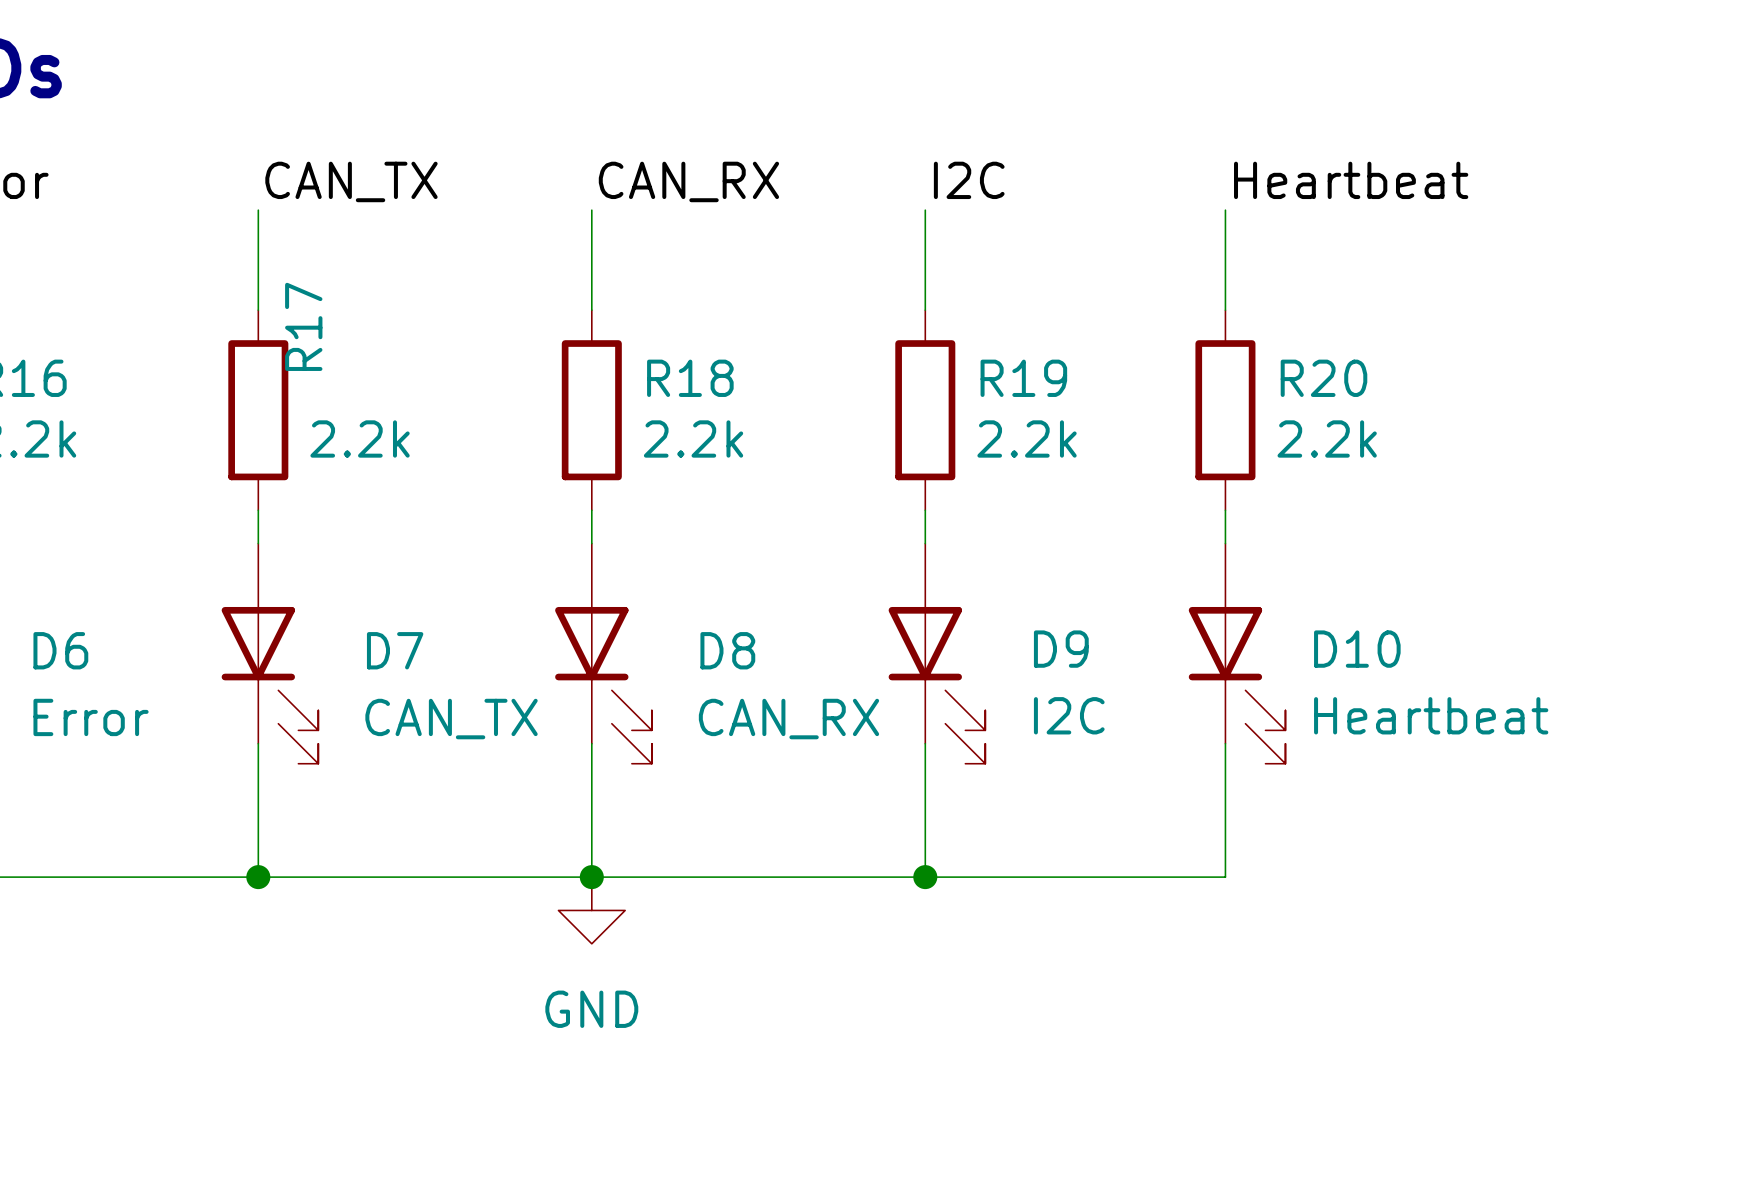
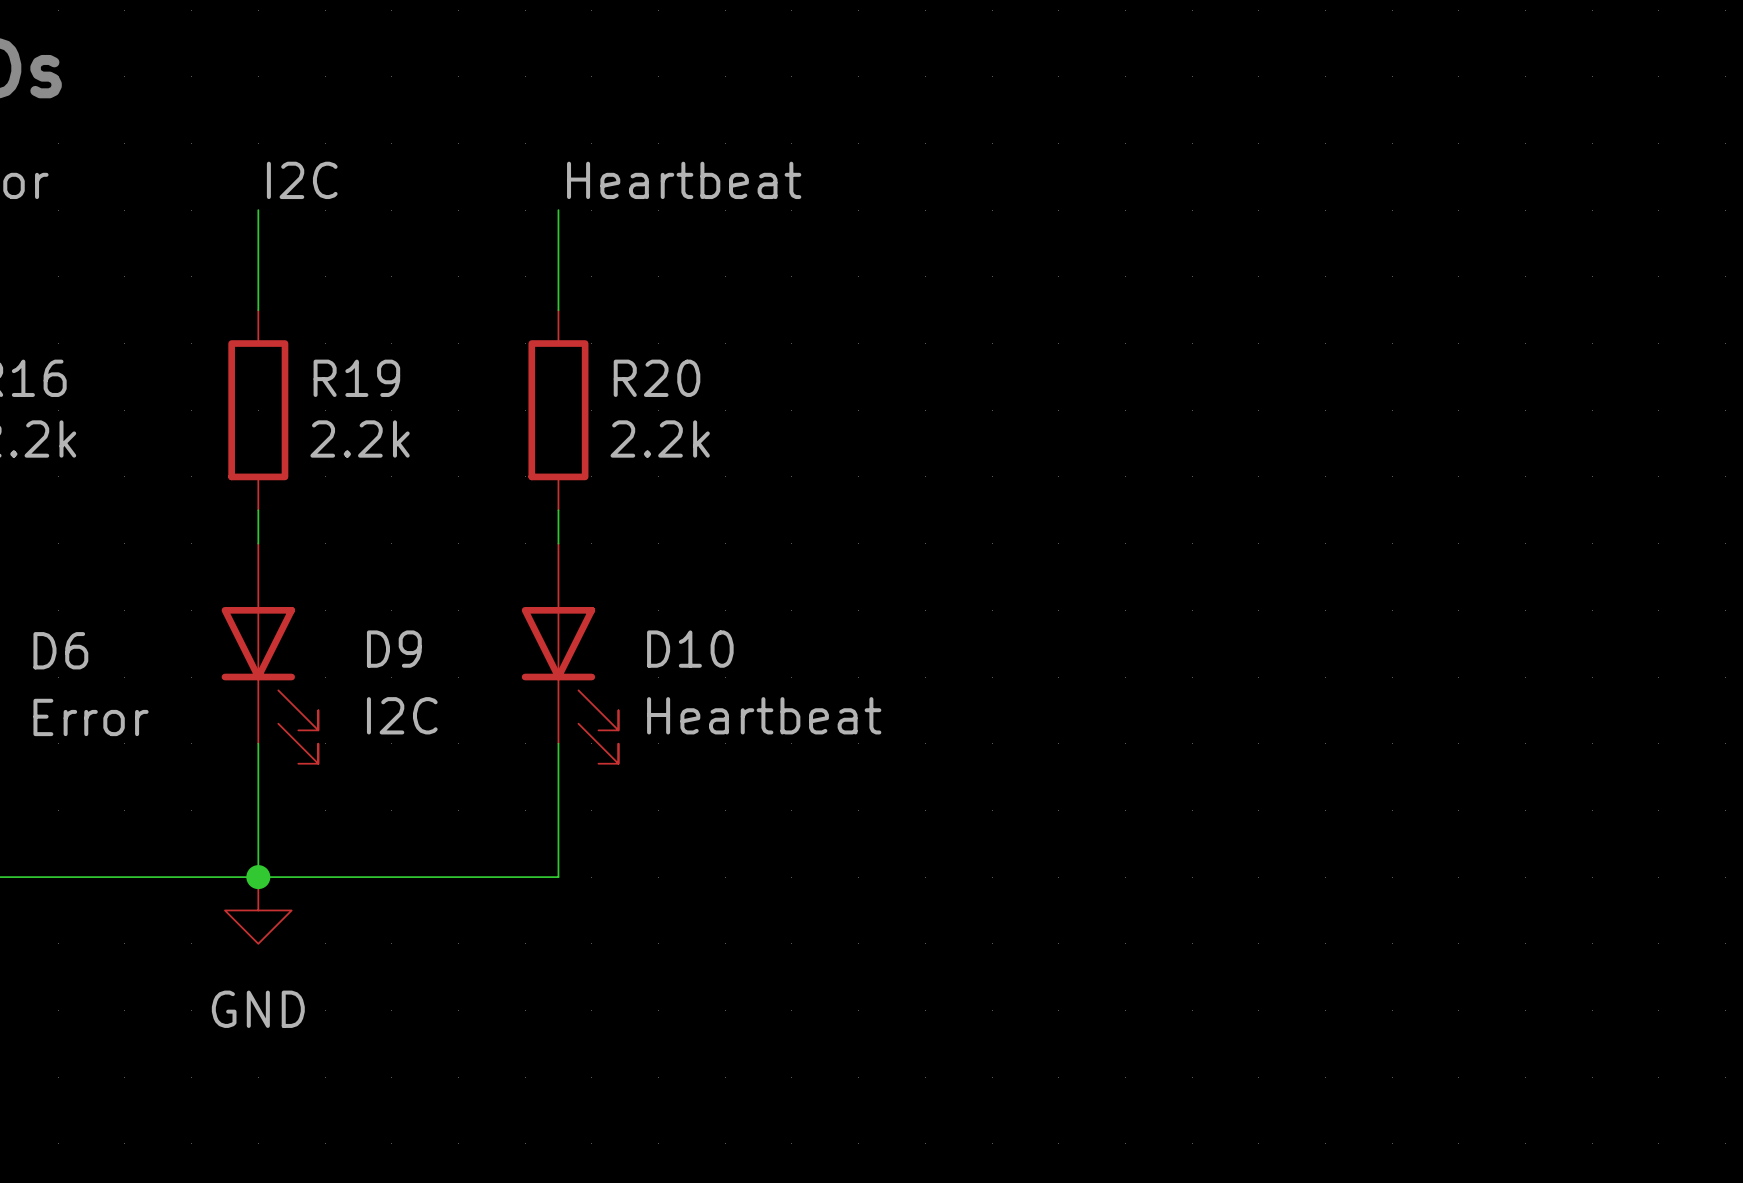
label: none -> Heartbeat (684, 180)
label: I2C (969, 180) -> none
label: Heartbeat (1351, 180) -> none
label: CAN_TX (351, 181) -> I2C (302, 180)
label: CAN_RX (688, 181) -> none
wire: (591, 210) (591, 310) -> (558, 210) (558, 310)
wire: (925, 210) (925, 310) -> none
wire: (1225, 210) (1225, 310) -> none
R17 name: R17 (303, 326) -> R19 (356, 378)
R18: 2.2k (591, 410) -> none
R19: 2.2k (925, 410) -> none
R20 position: (1225, 410) -> (558, 410)
wire: (591, 510) (591, 543) -> (558, 510) (558, 543)
wire: (925, 510) (925, 543) -> none
wire: (1225, 510) (1225, 543) -> none
D7 name: D7 (395, 650) -> D9 (394, 649)
D8: CAN_RX (603, 653) -> none
D9: I2C (936, 653) -> none
D10 position: (1237, 653) -> (570, 653)
D7 value: CAN_TX (451, 719) -> I2C (402, 715)
wire: (591, 743) (591, 877) -> none
wire: (925, 743) (925, 877) -> none
wire: (1225, 743) (1225, 877) (558, 877) -> (558, 743) (558, 877)
junction: (591, 877) -> none
junction: (925, 877) -> none
power symbol position: GND (591, 910) -> GND (258, 910)

